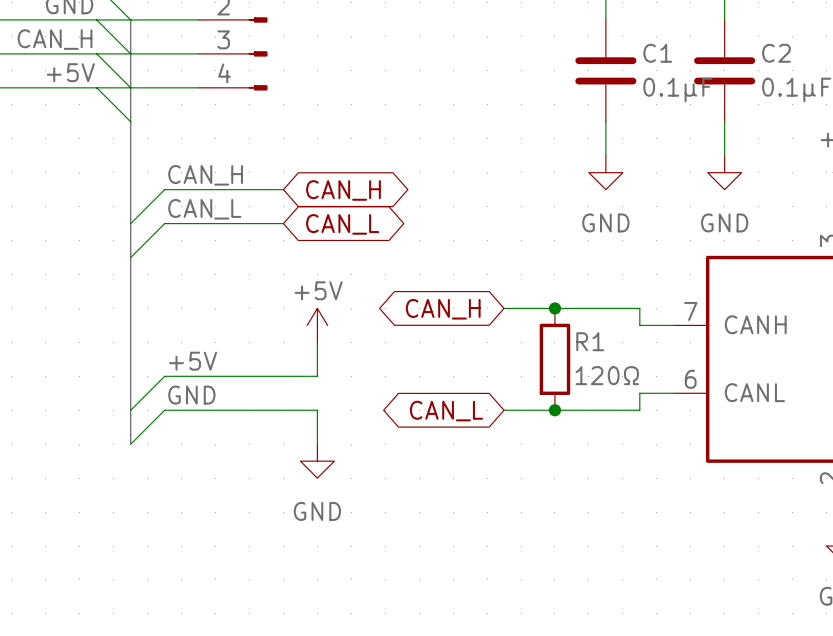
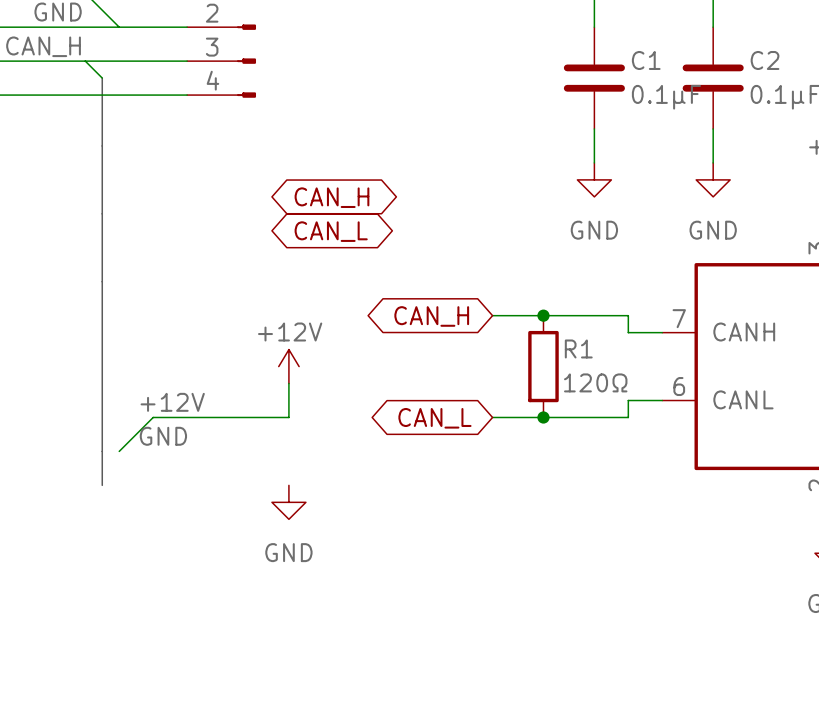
wire: (96, 19) (130, 53) -> none
bus: (130, 19) (130, 444) -> none
wire: (113, 70) (130, 87) -> none
bus: none -> (102, 78) (102, 485)
label: +5V (70, 72) -> none
wire: (96, 87) (130, 121) -> none
label: CAN_H (205, 175) -> none
wire: (283, 189) (164, 189) (130, 223) -> none
label: CAN_L (204, 209) -> none
wire: (283, 223) (164, 223) (130, 257) -> none
power symbol: +5V (317, 325) -> none
wire: (317, 342) (317, 376) (164, 376) (130, 410) -> none
power symbol: none -> +12V (288, 366)
label: +5V (193, 361) -> none
label: none -> +12V (172, 402)
label position: GND (191, 395) -> GND (163, 436)
wire: (300, 410) (317, 410) (317, 444) -> (288, 417) (288, 383)
power symbol position: GND (317, 461) -> GND (288, 502)

